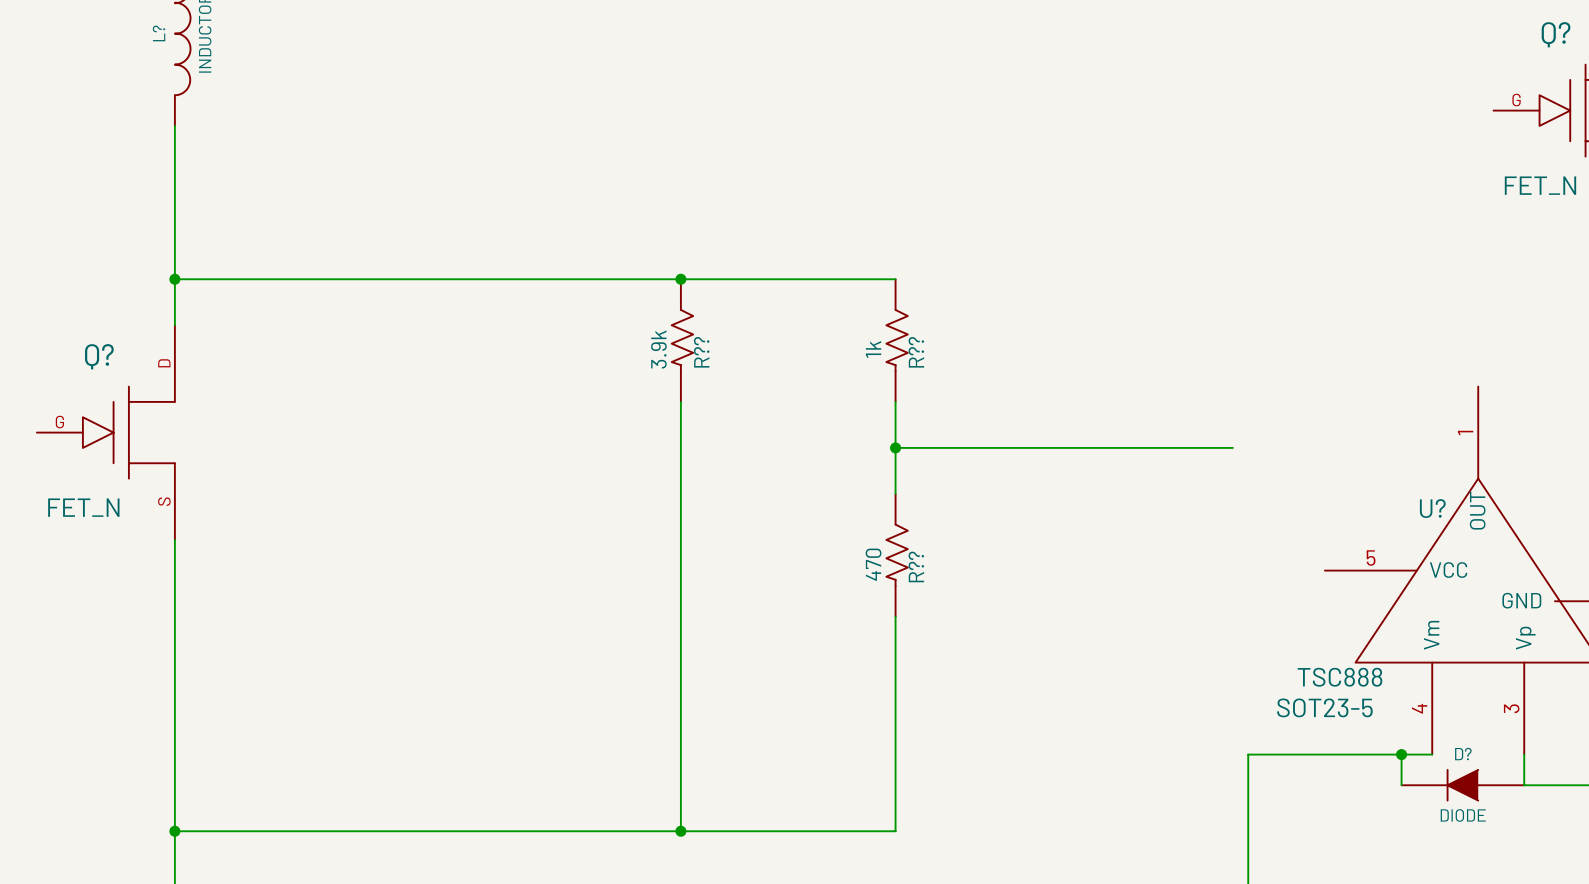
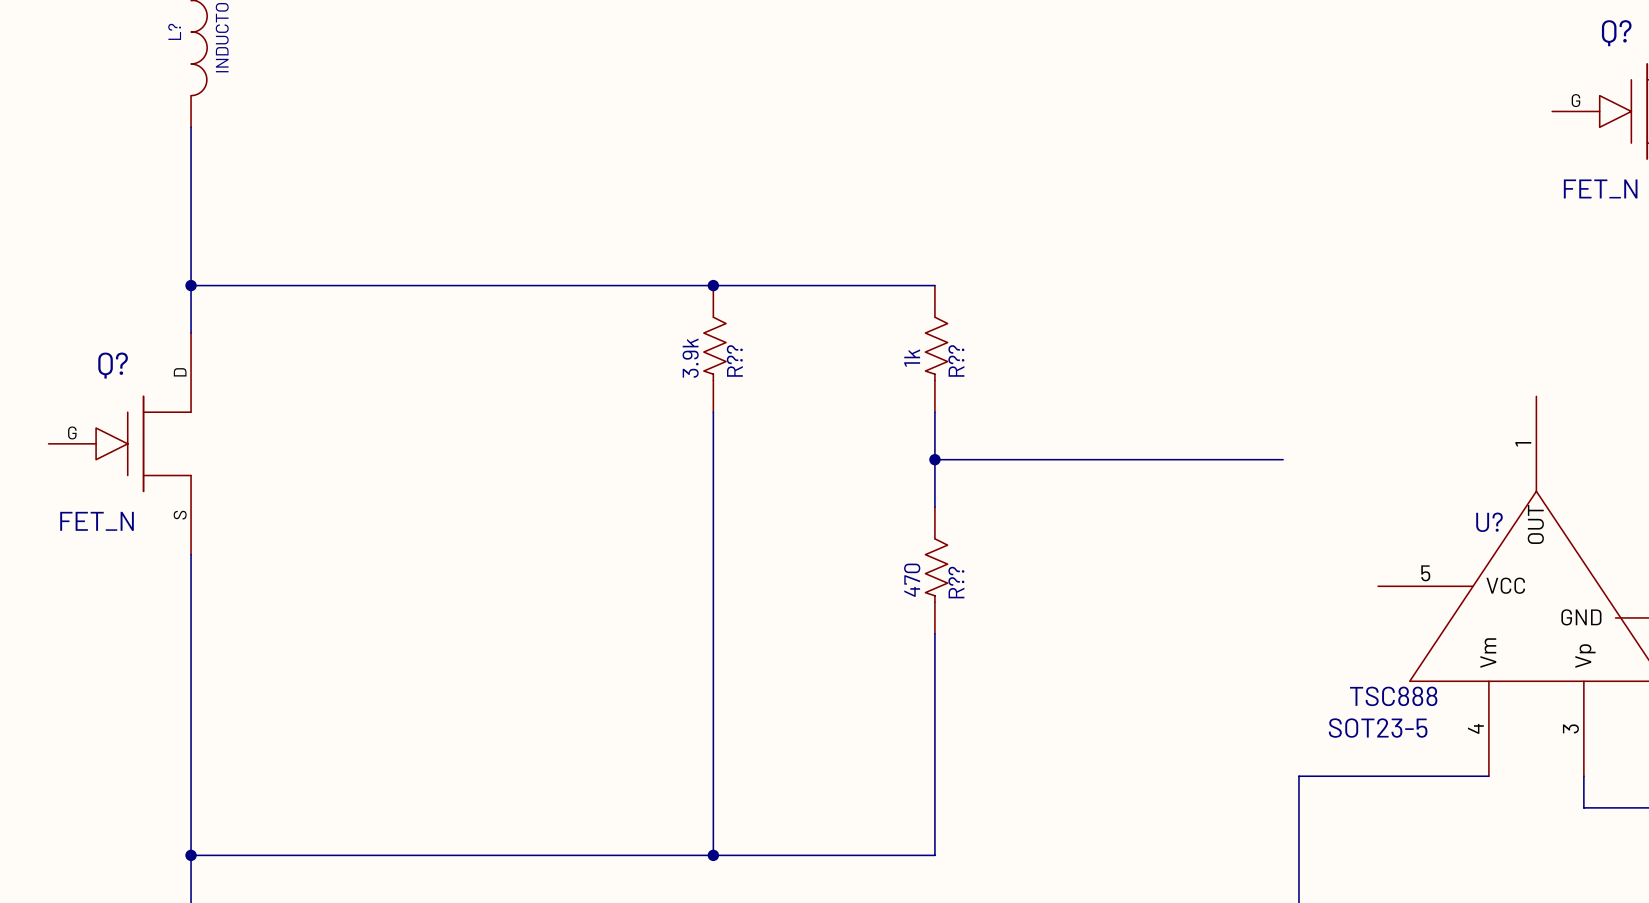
wire: (1401, 754) (1401, 785) -> none
junction: (1401, 754) -> none
D?: DIODE (1462, 785) -> none

